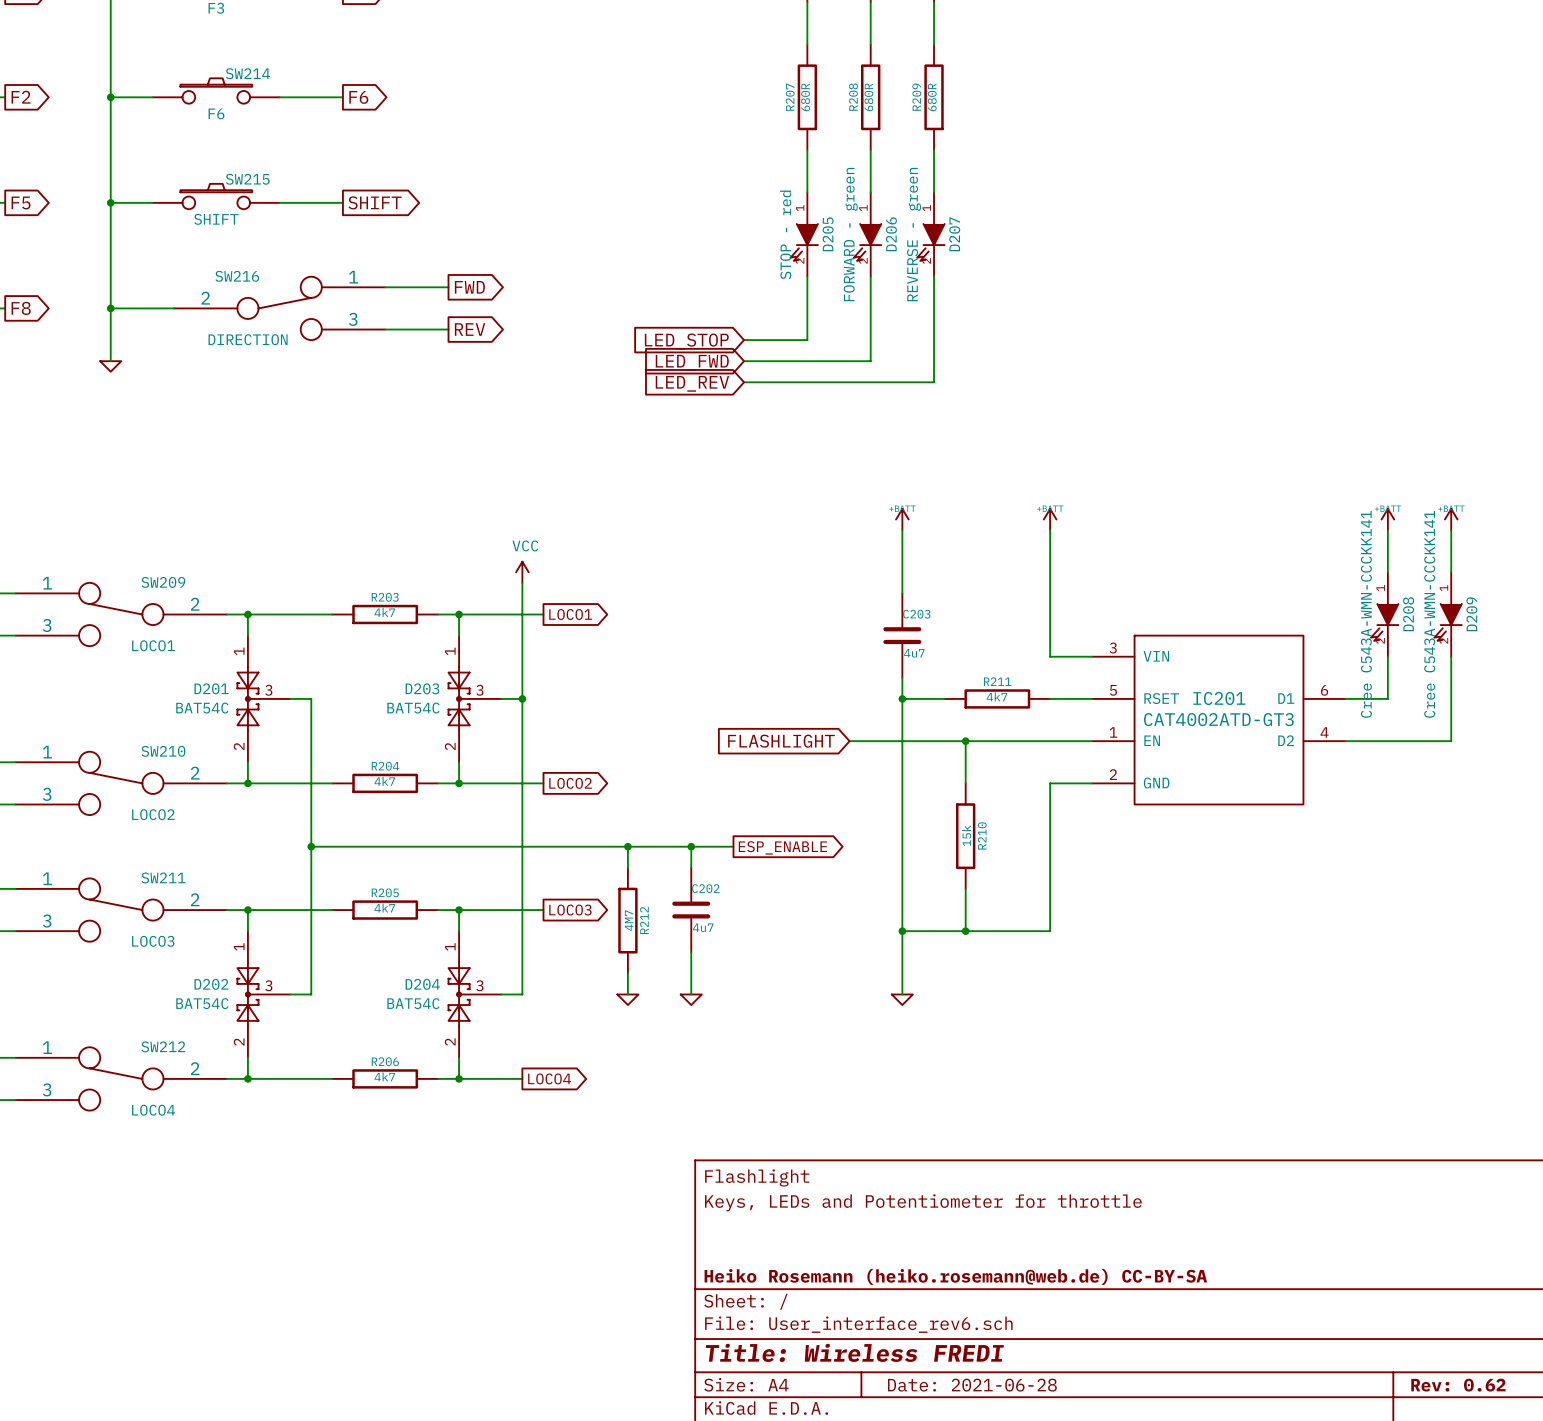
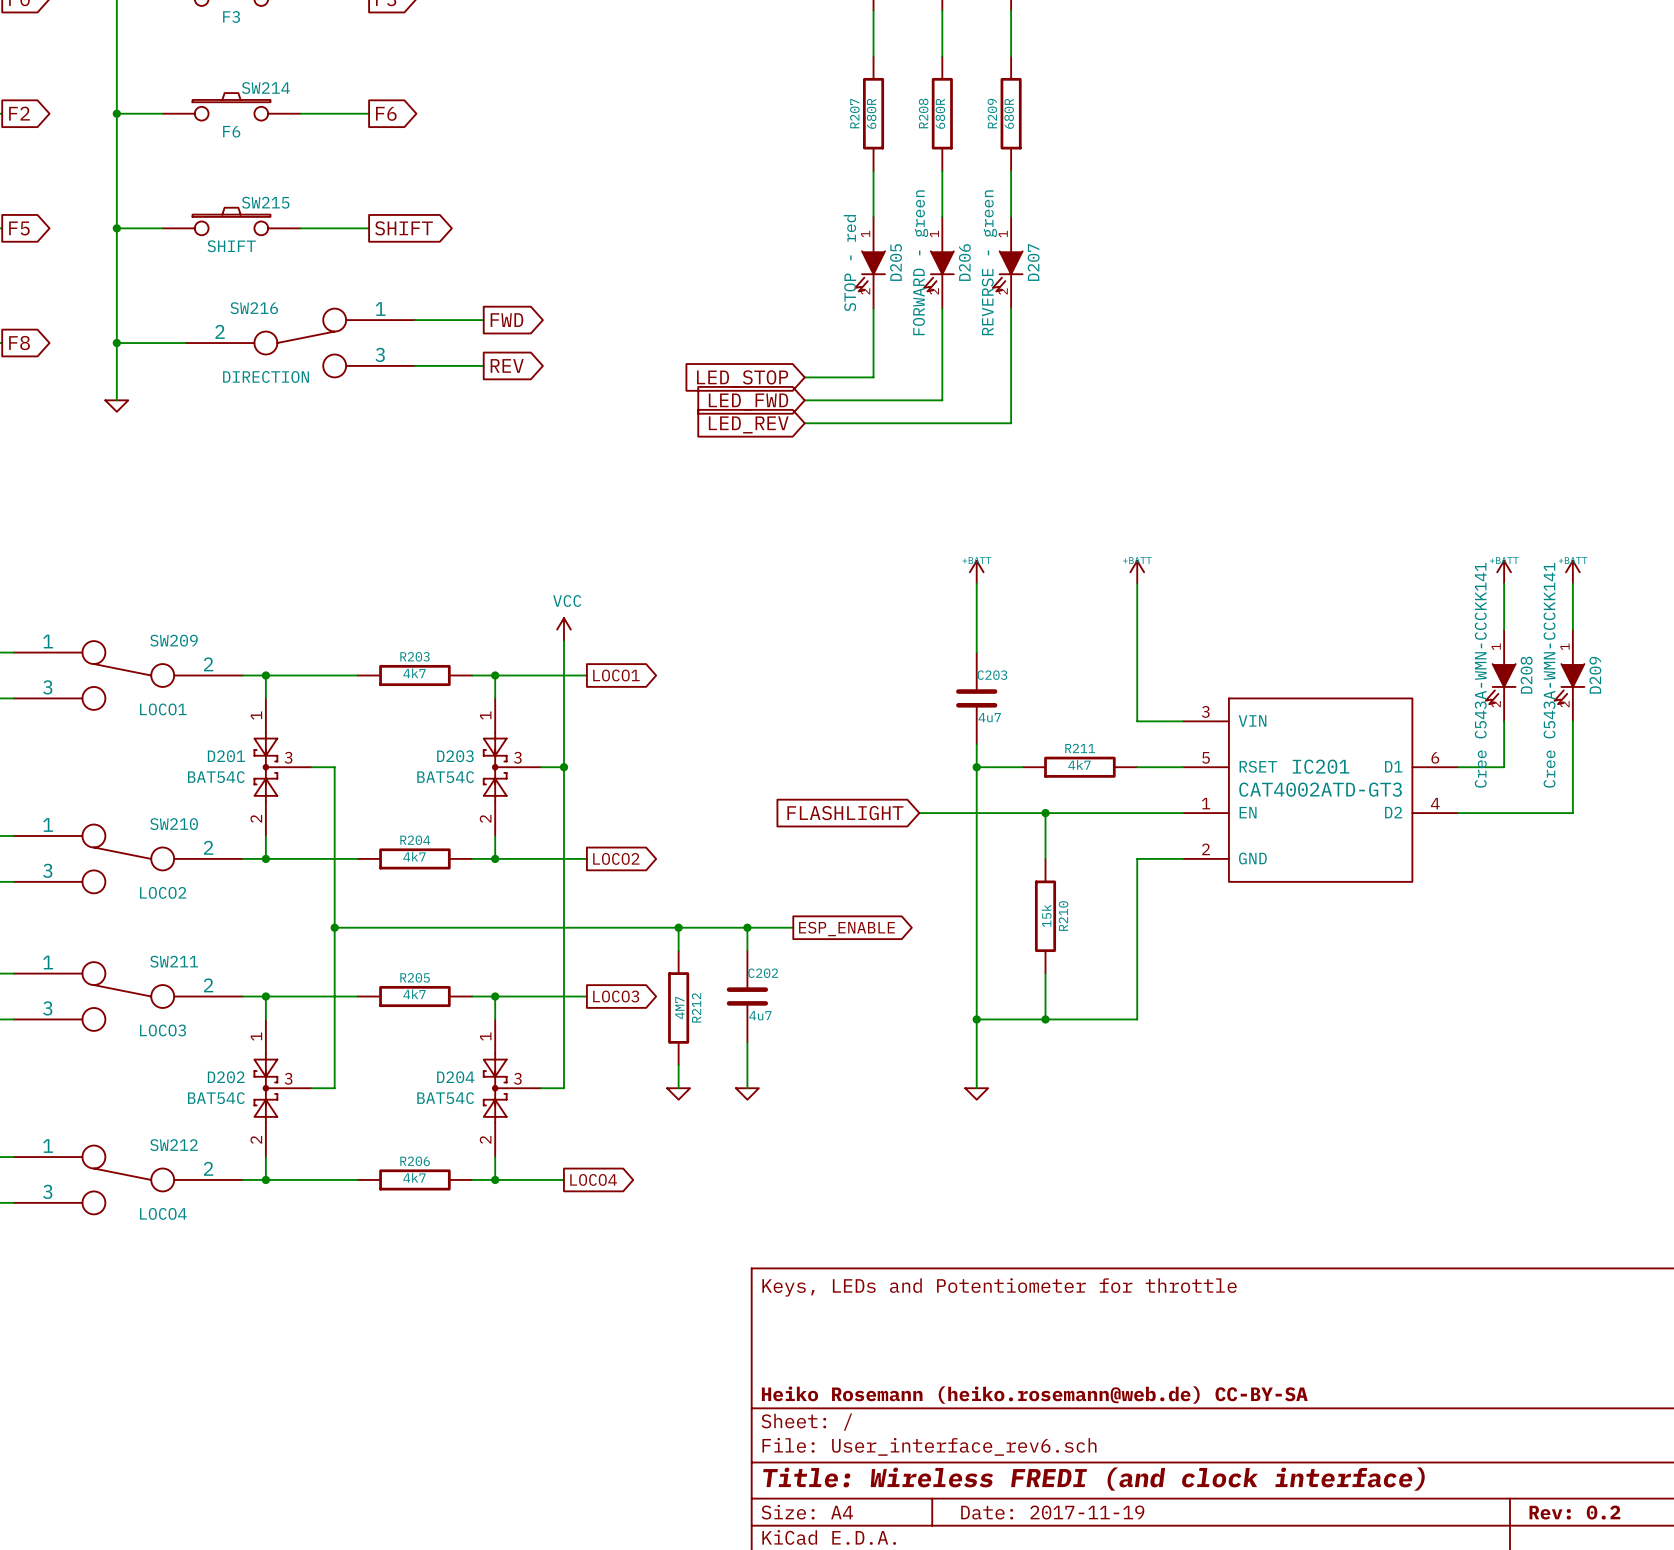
title block: Flashlight (757, 1177) -> Keys, LEDs and Potentiometer for throttle (999, 1287)
title block: Keys, LEDs and Potentiometer for throttle (923, 1202) -> none
title block: Title: Wireless FREDI (854, 1352) -> Title: Wireless FREDI (and clock interface) (1094, 1479)
title block: Date: 2021-06-28 (972, 1385) -> Date: 2017-11-19 (1052, 1512)
title block: Rev: 0.62 (1458, 1385) -> Rev: 0.2 (1574, 1512)

